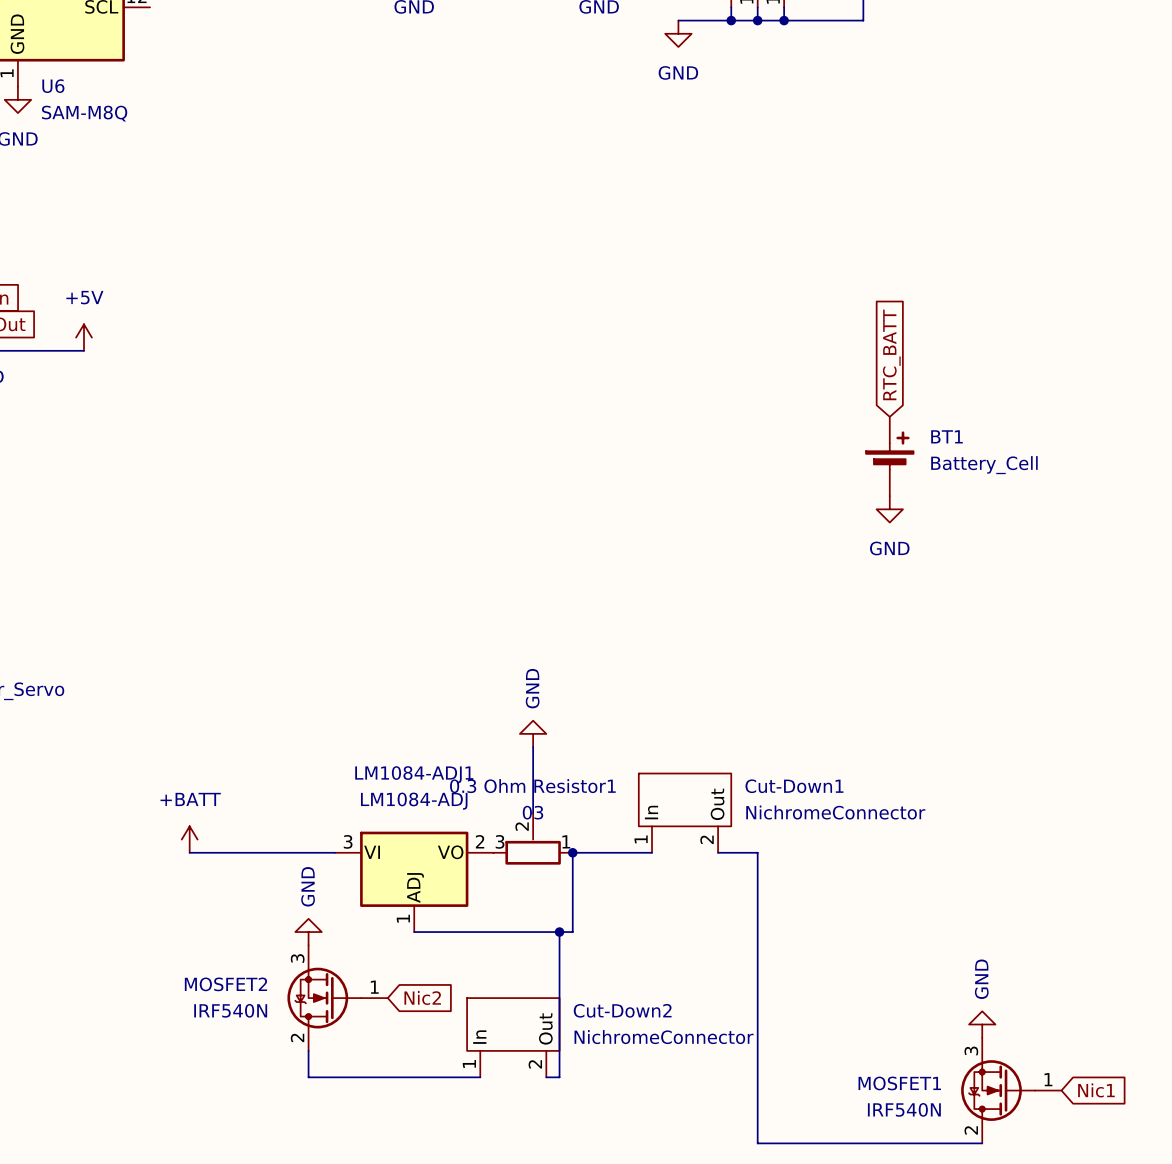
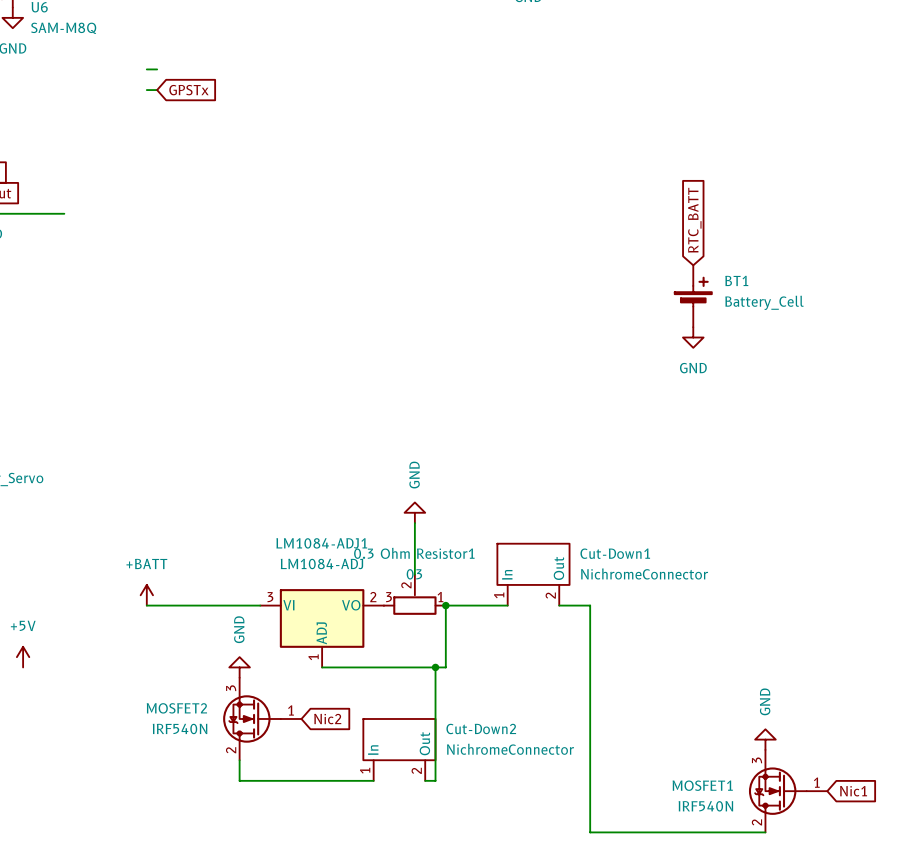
wire: none -> (146, 69) (157, 69)
wire: none -> (146, 90) (157, 90)
global label: none -> GPSTx (188, 90)
power symbol: +5V (83, 337) -> none
power symbol: none -> +5V (23, 657)

